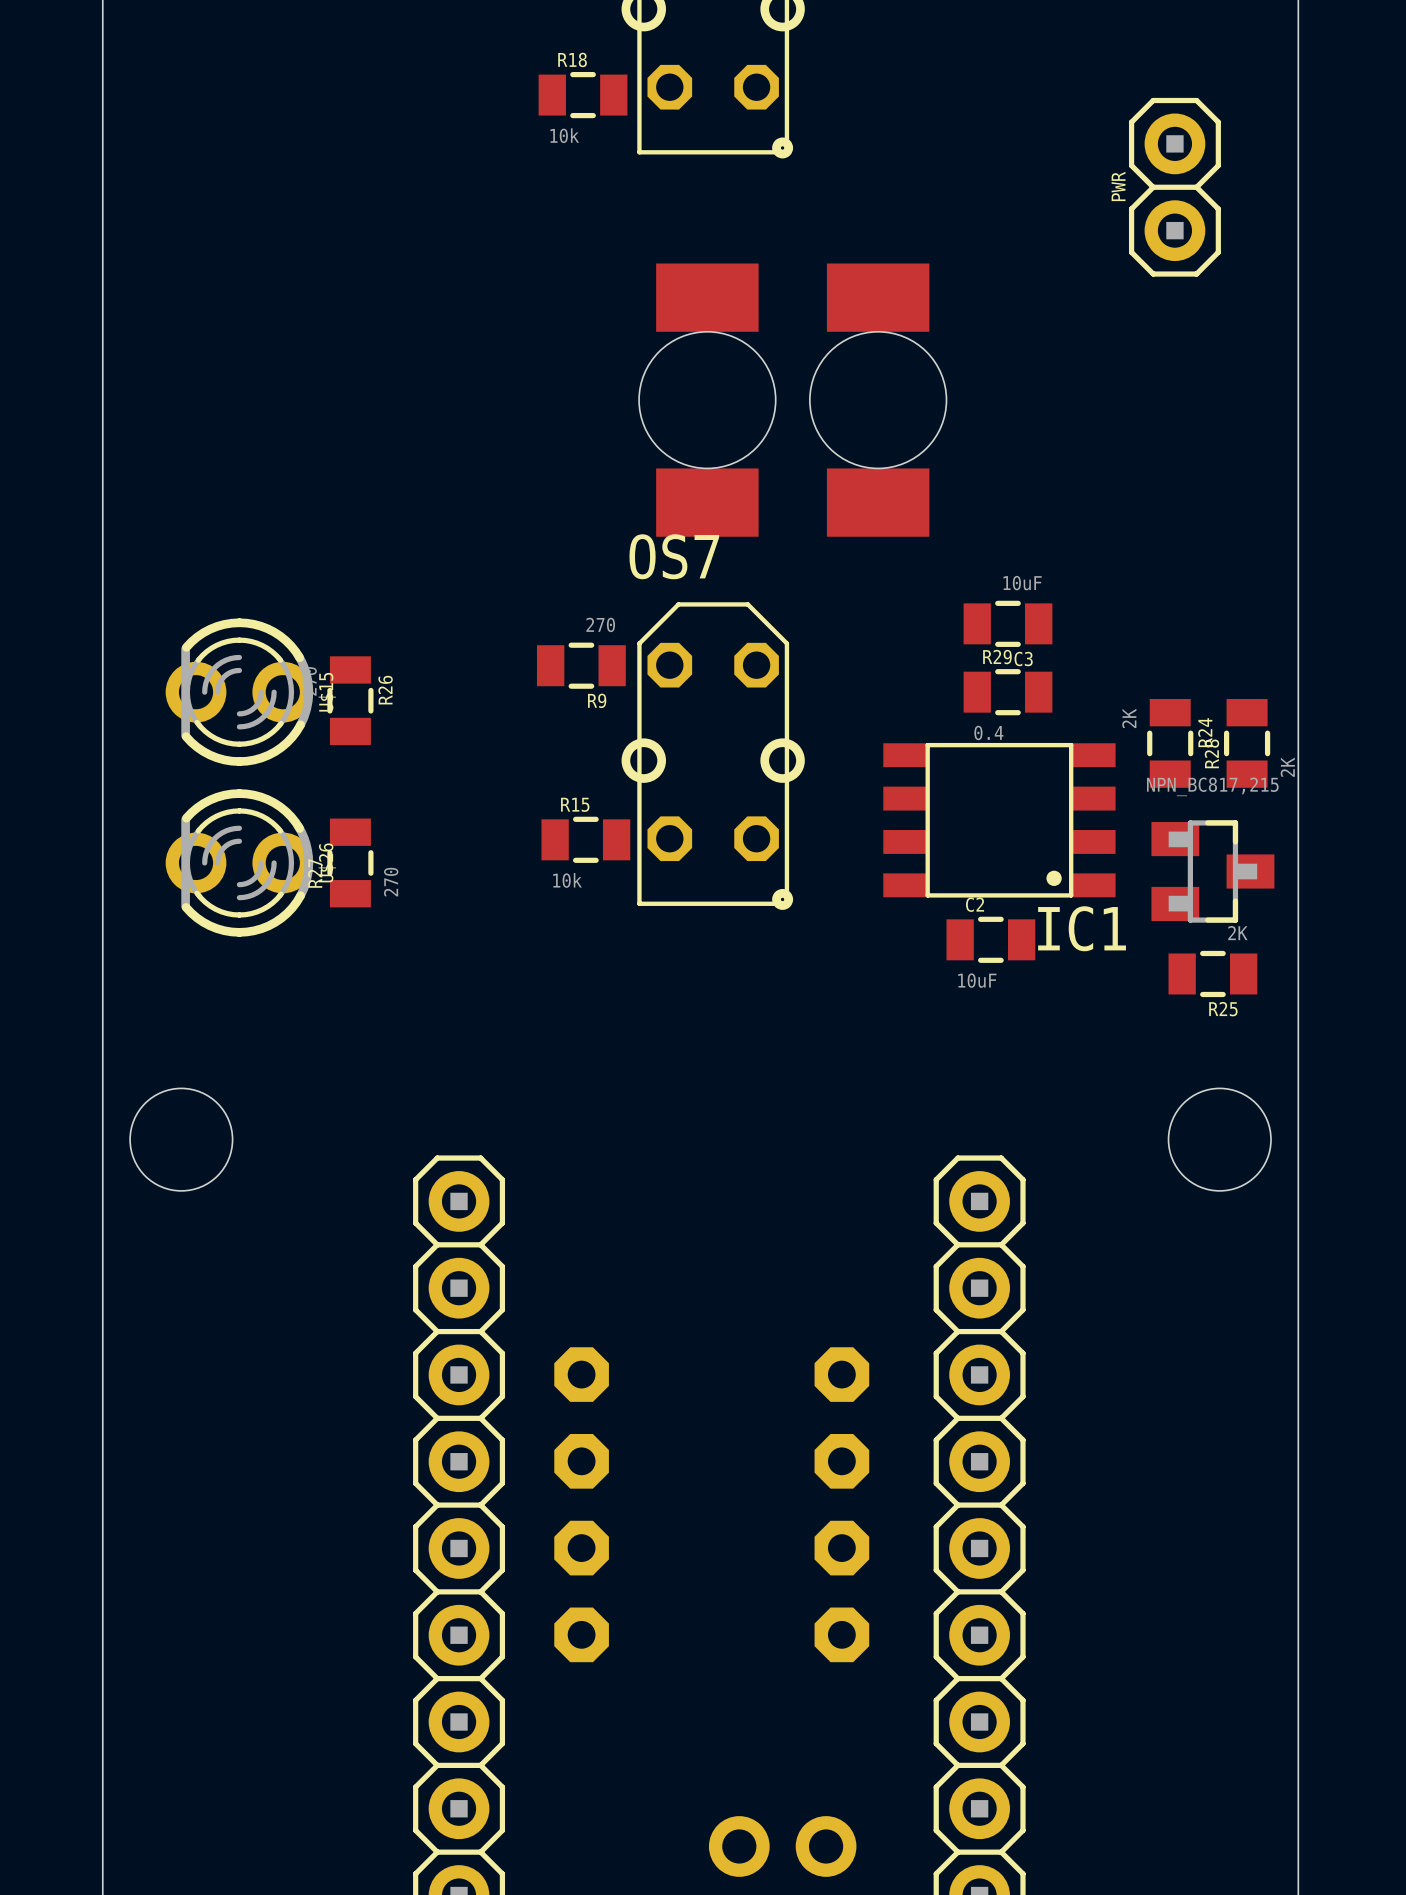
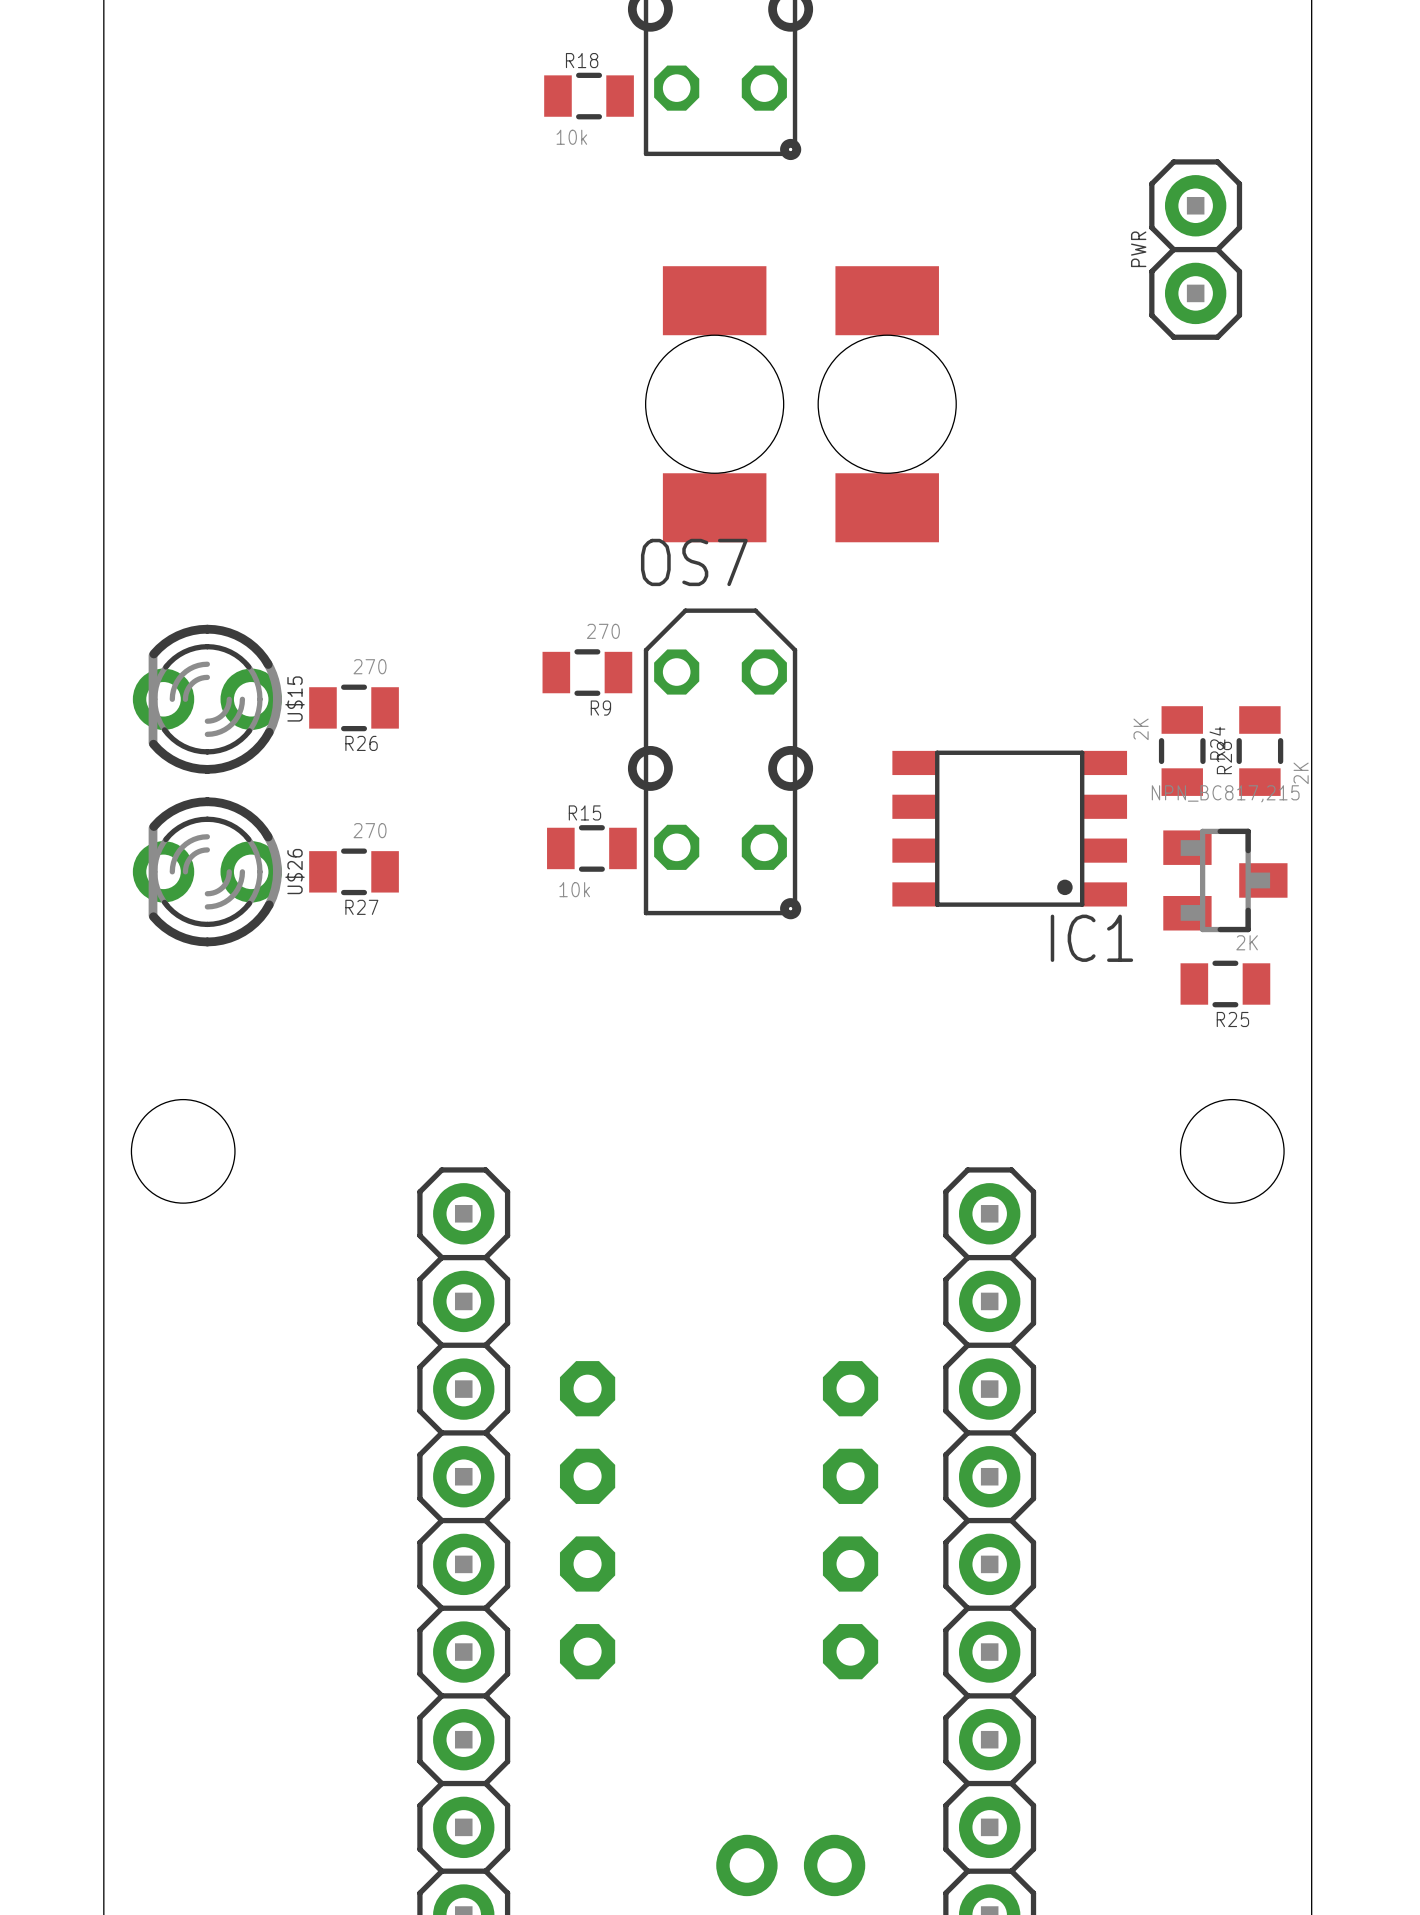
PWR position: (1174, 187) -> (1195, 249)
C3: 10uF (1007, 623) -> none
U$15 position: (239, 692) -> (207, 699)
R29: 0.4 (1007, 692) -> none
R26 rotation: 0° (350, 700) -> 90° clockwise (354, 707)
U$26 position: (239, 862) -> (207, 871)
R27 rotation: 0° (350, 862) -> 90° clockwise (354, 871)
C2: 10uF (990, 939) -> none

